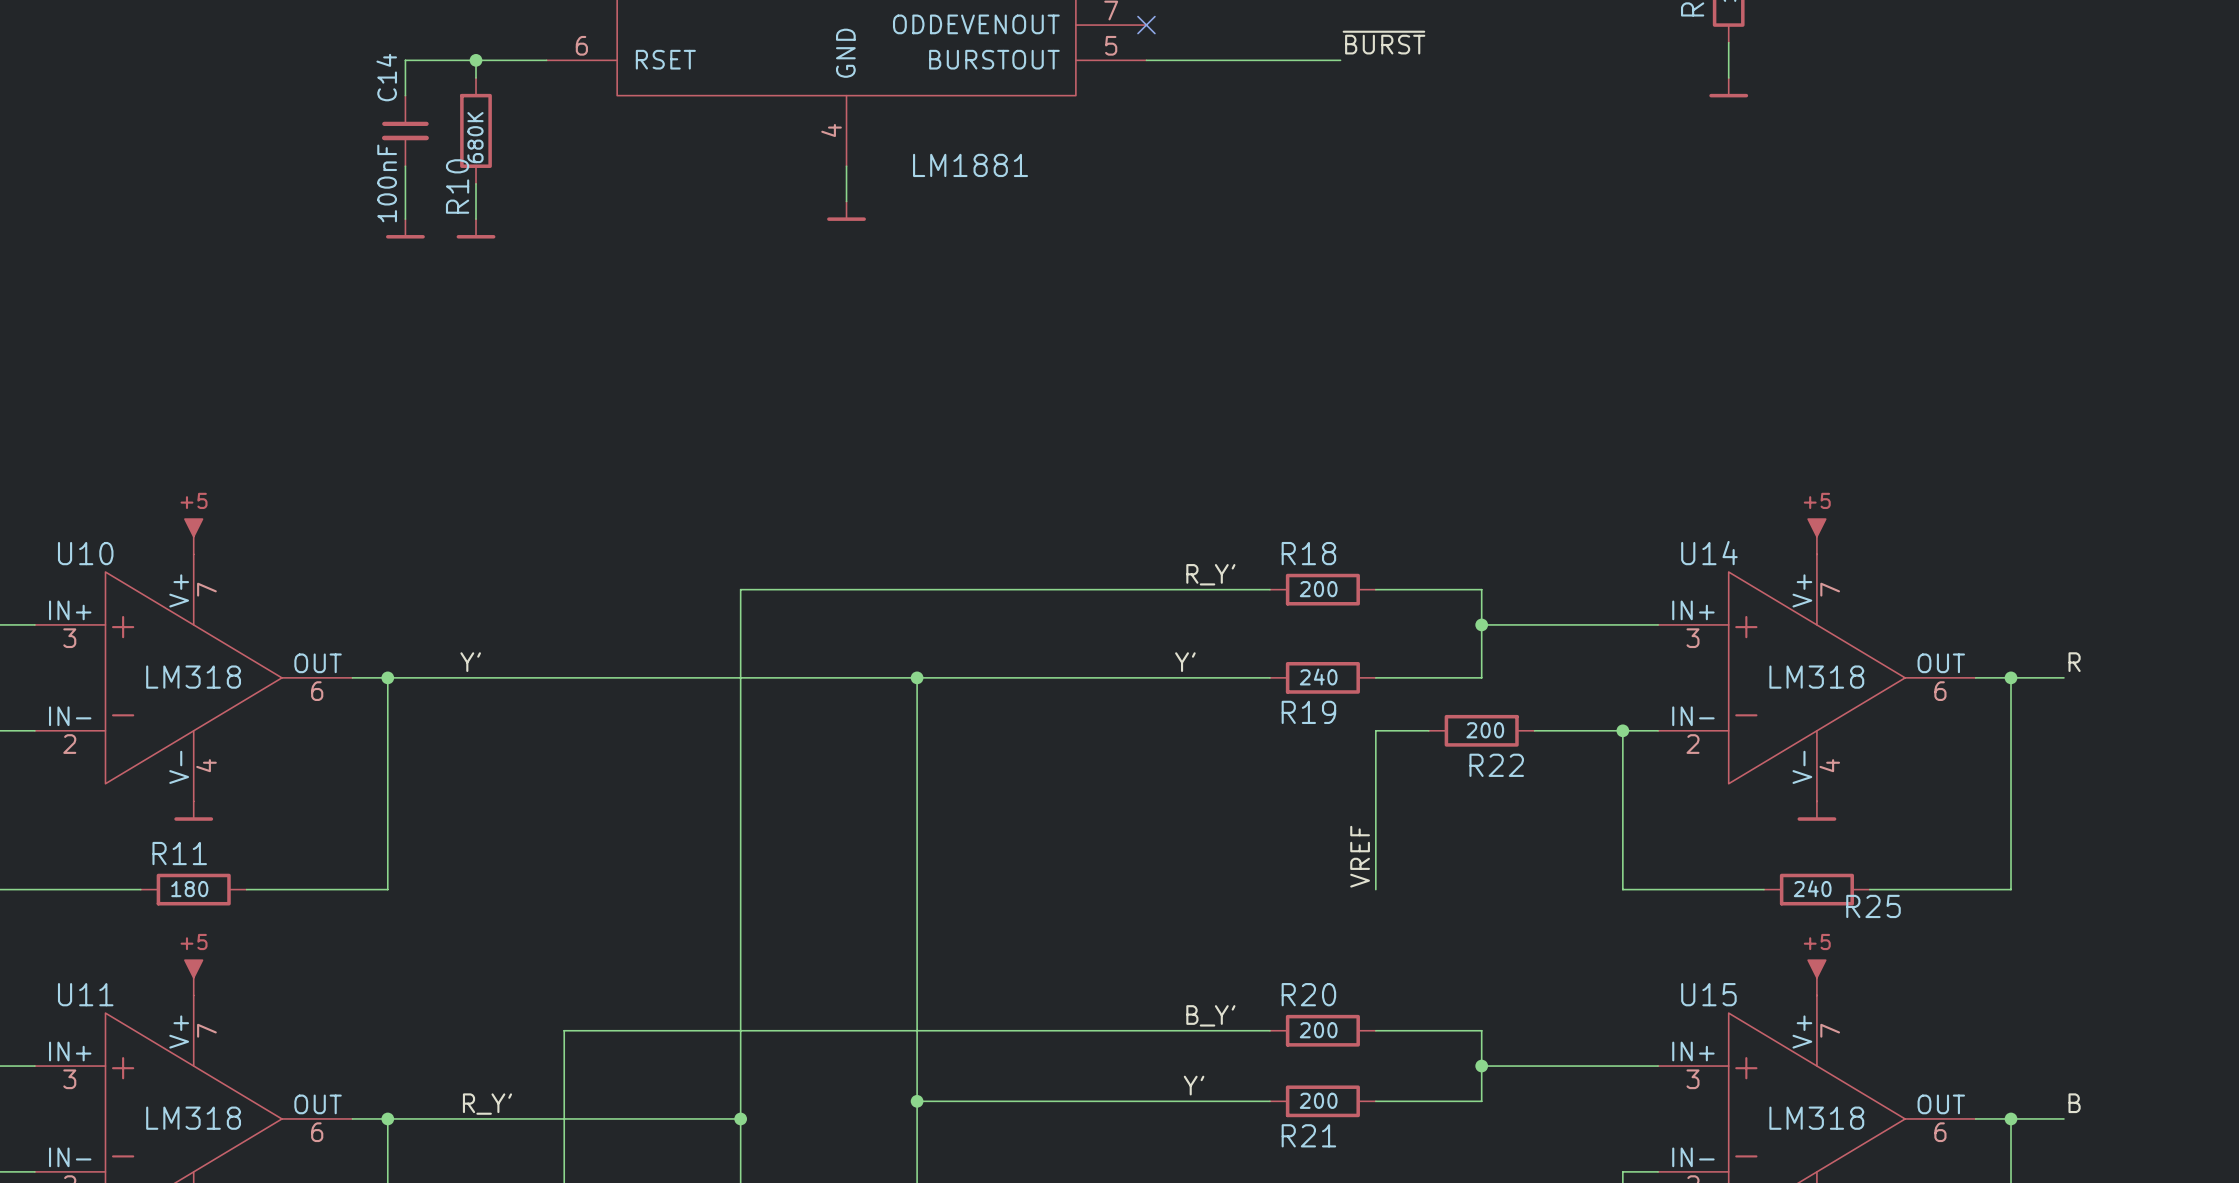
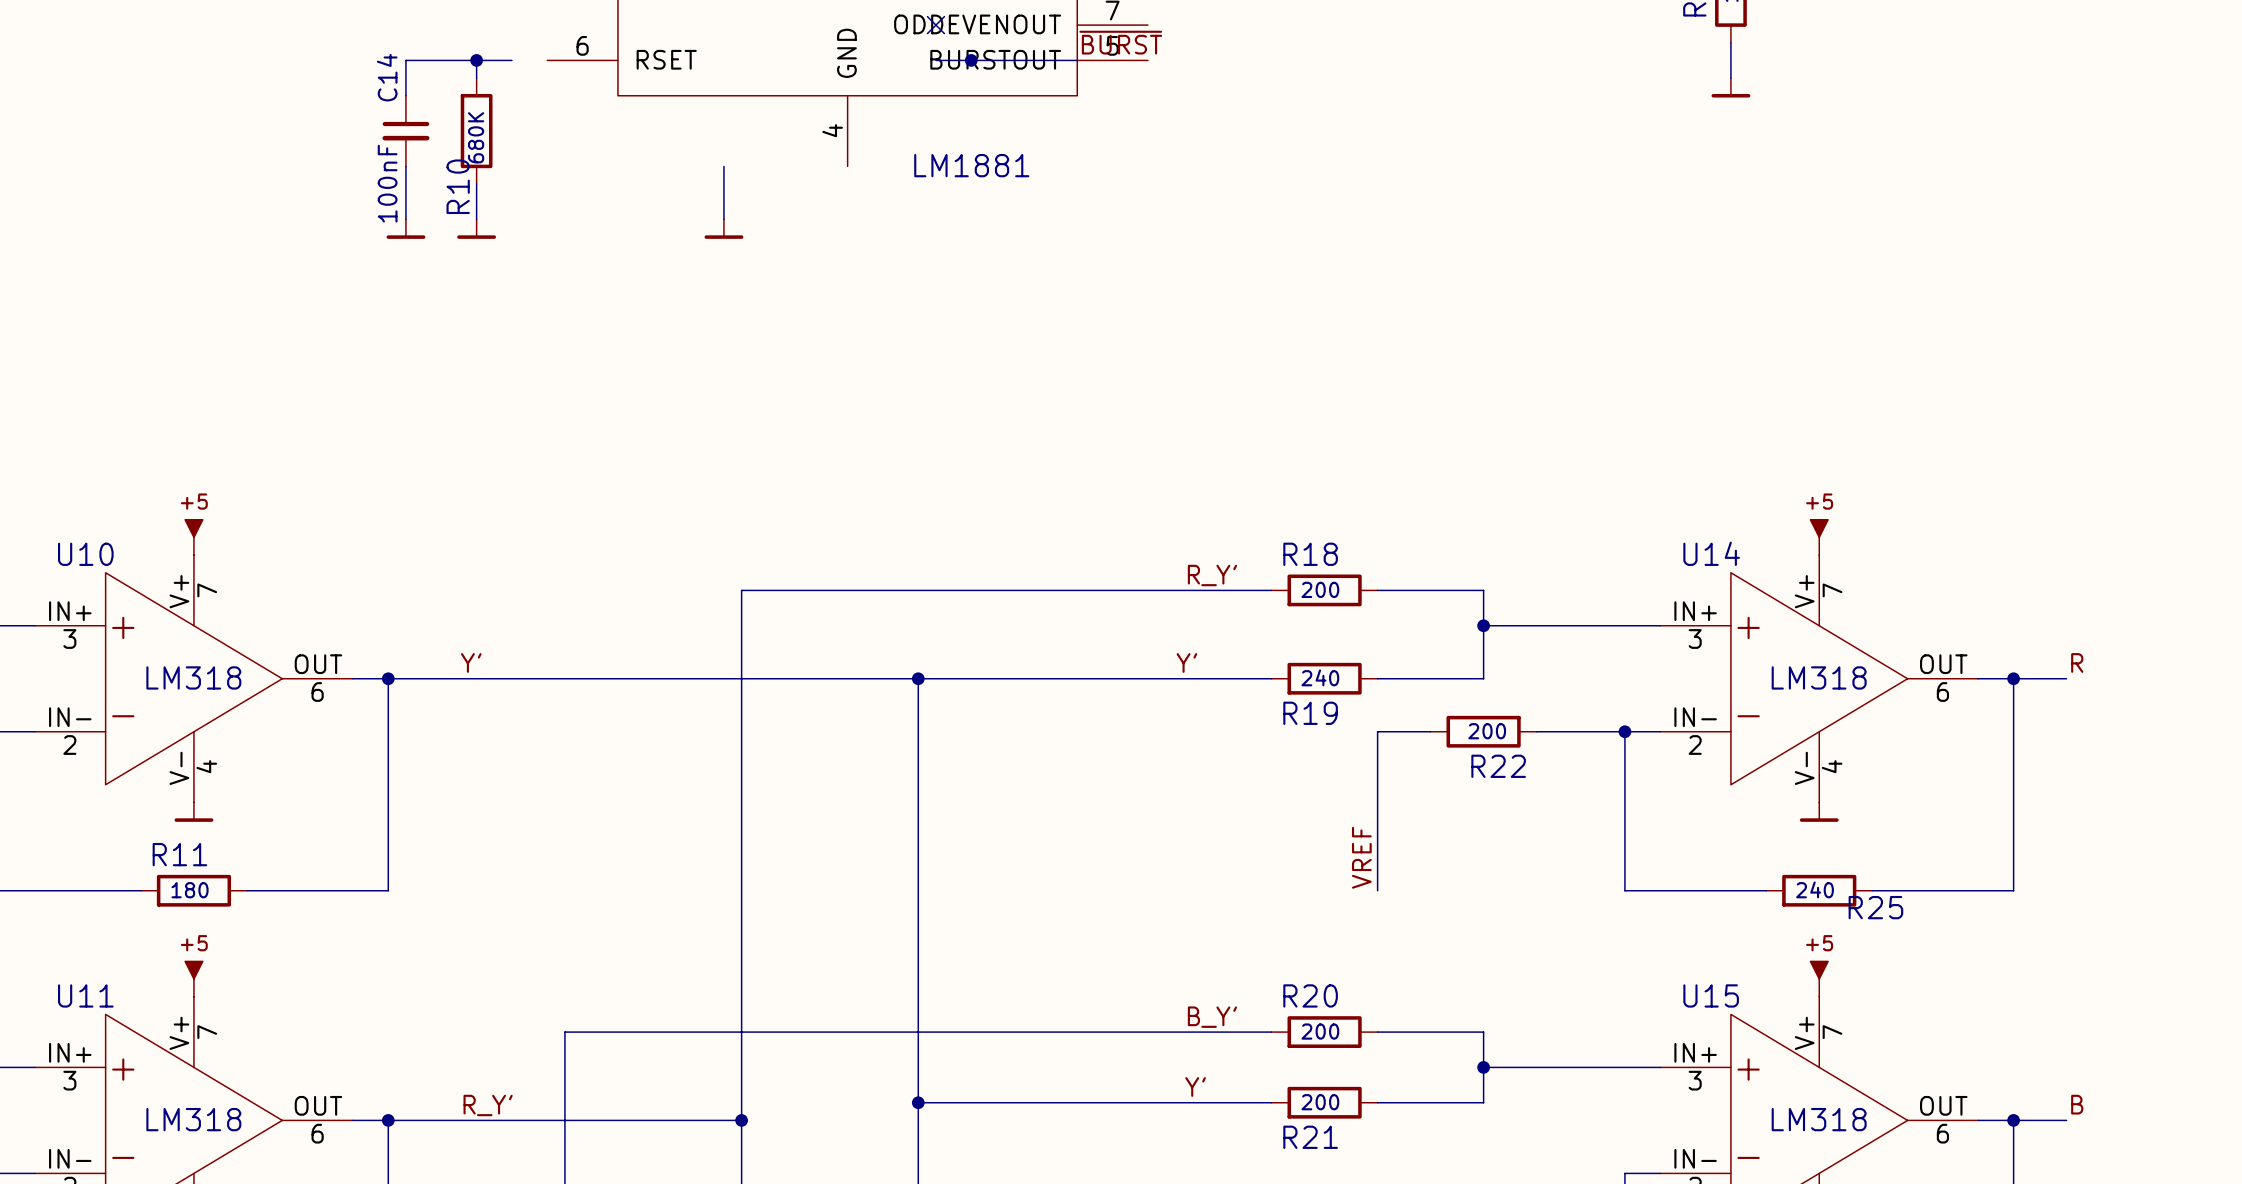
no-connect mark: none -> (935, 25)
no-connect mark: (1146, 25) -> none
label position: ~{BURST} (1383, 42) -> ~{BURST} (1120, 42)
wire: (511, 60) (546, 60) -> none
wire: none -> (935, 60) (1077, 60)
junction: none -> (971, 60)
wire: (1146, 60) (1340, 60) -> none
wire: none -> (723, 166) (723, 219)
wire: (846, 166) (846, 201) -> none
power symbol position: (846, 211) -> (723, 229)

